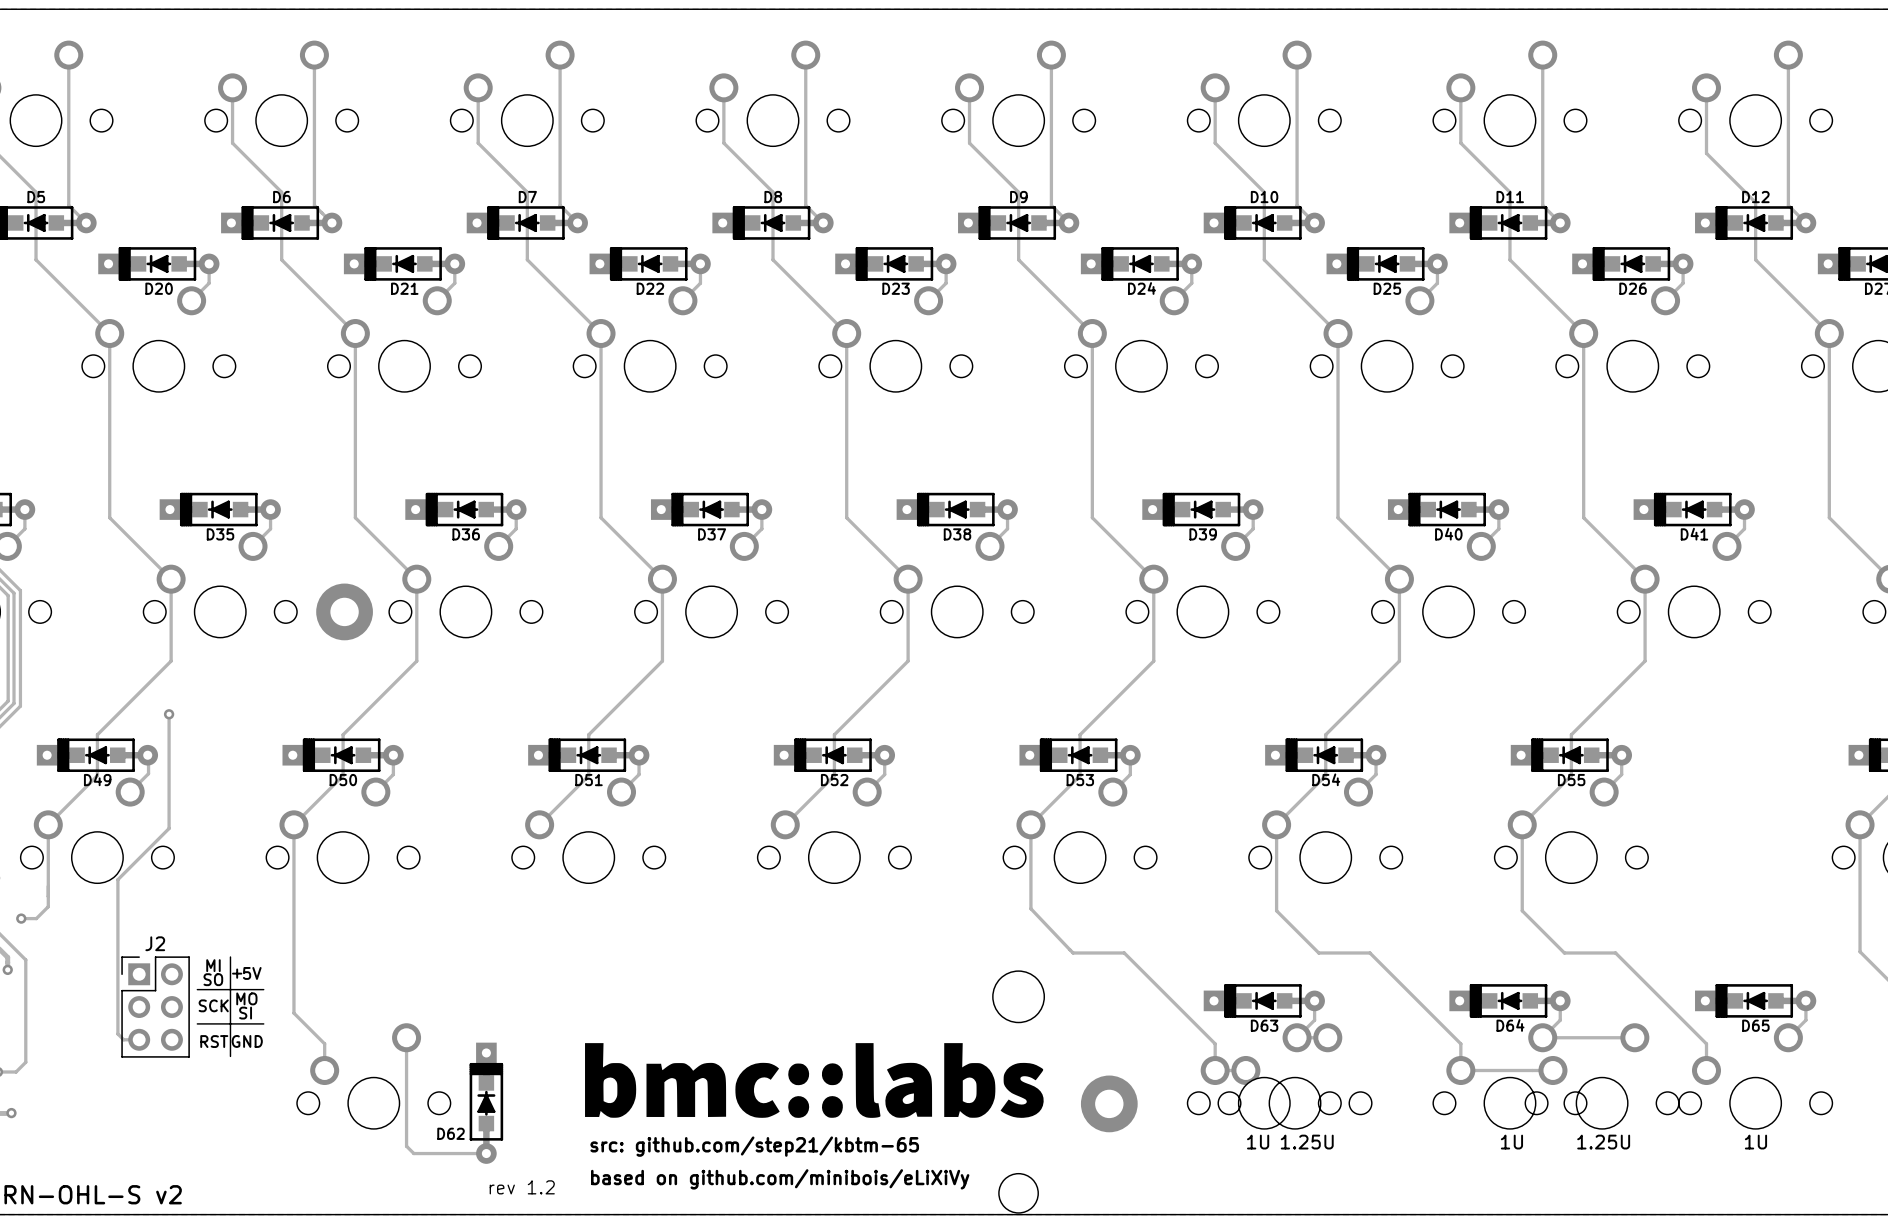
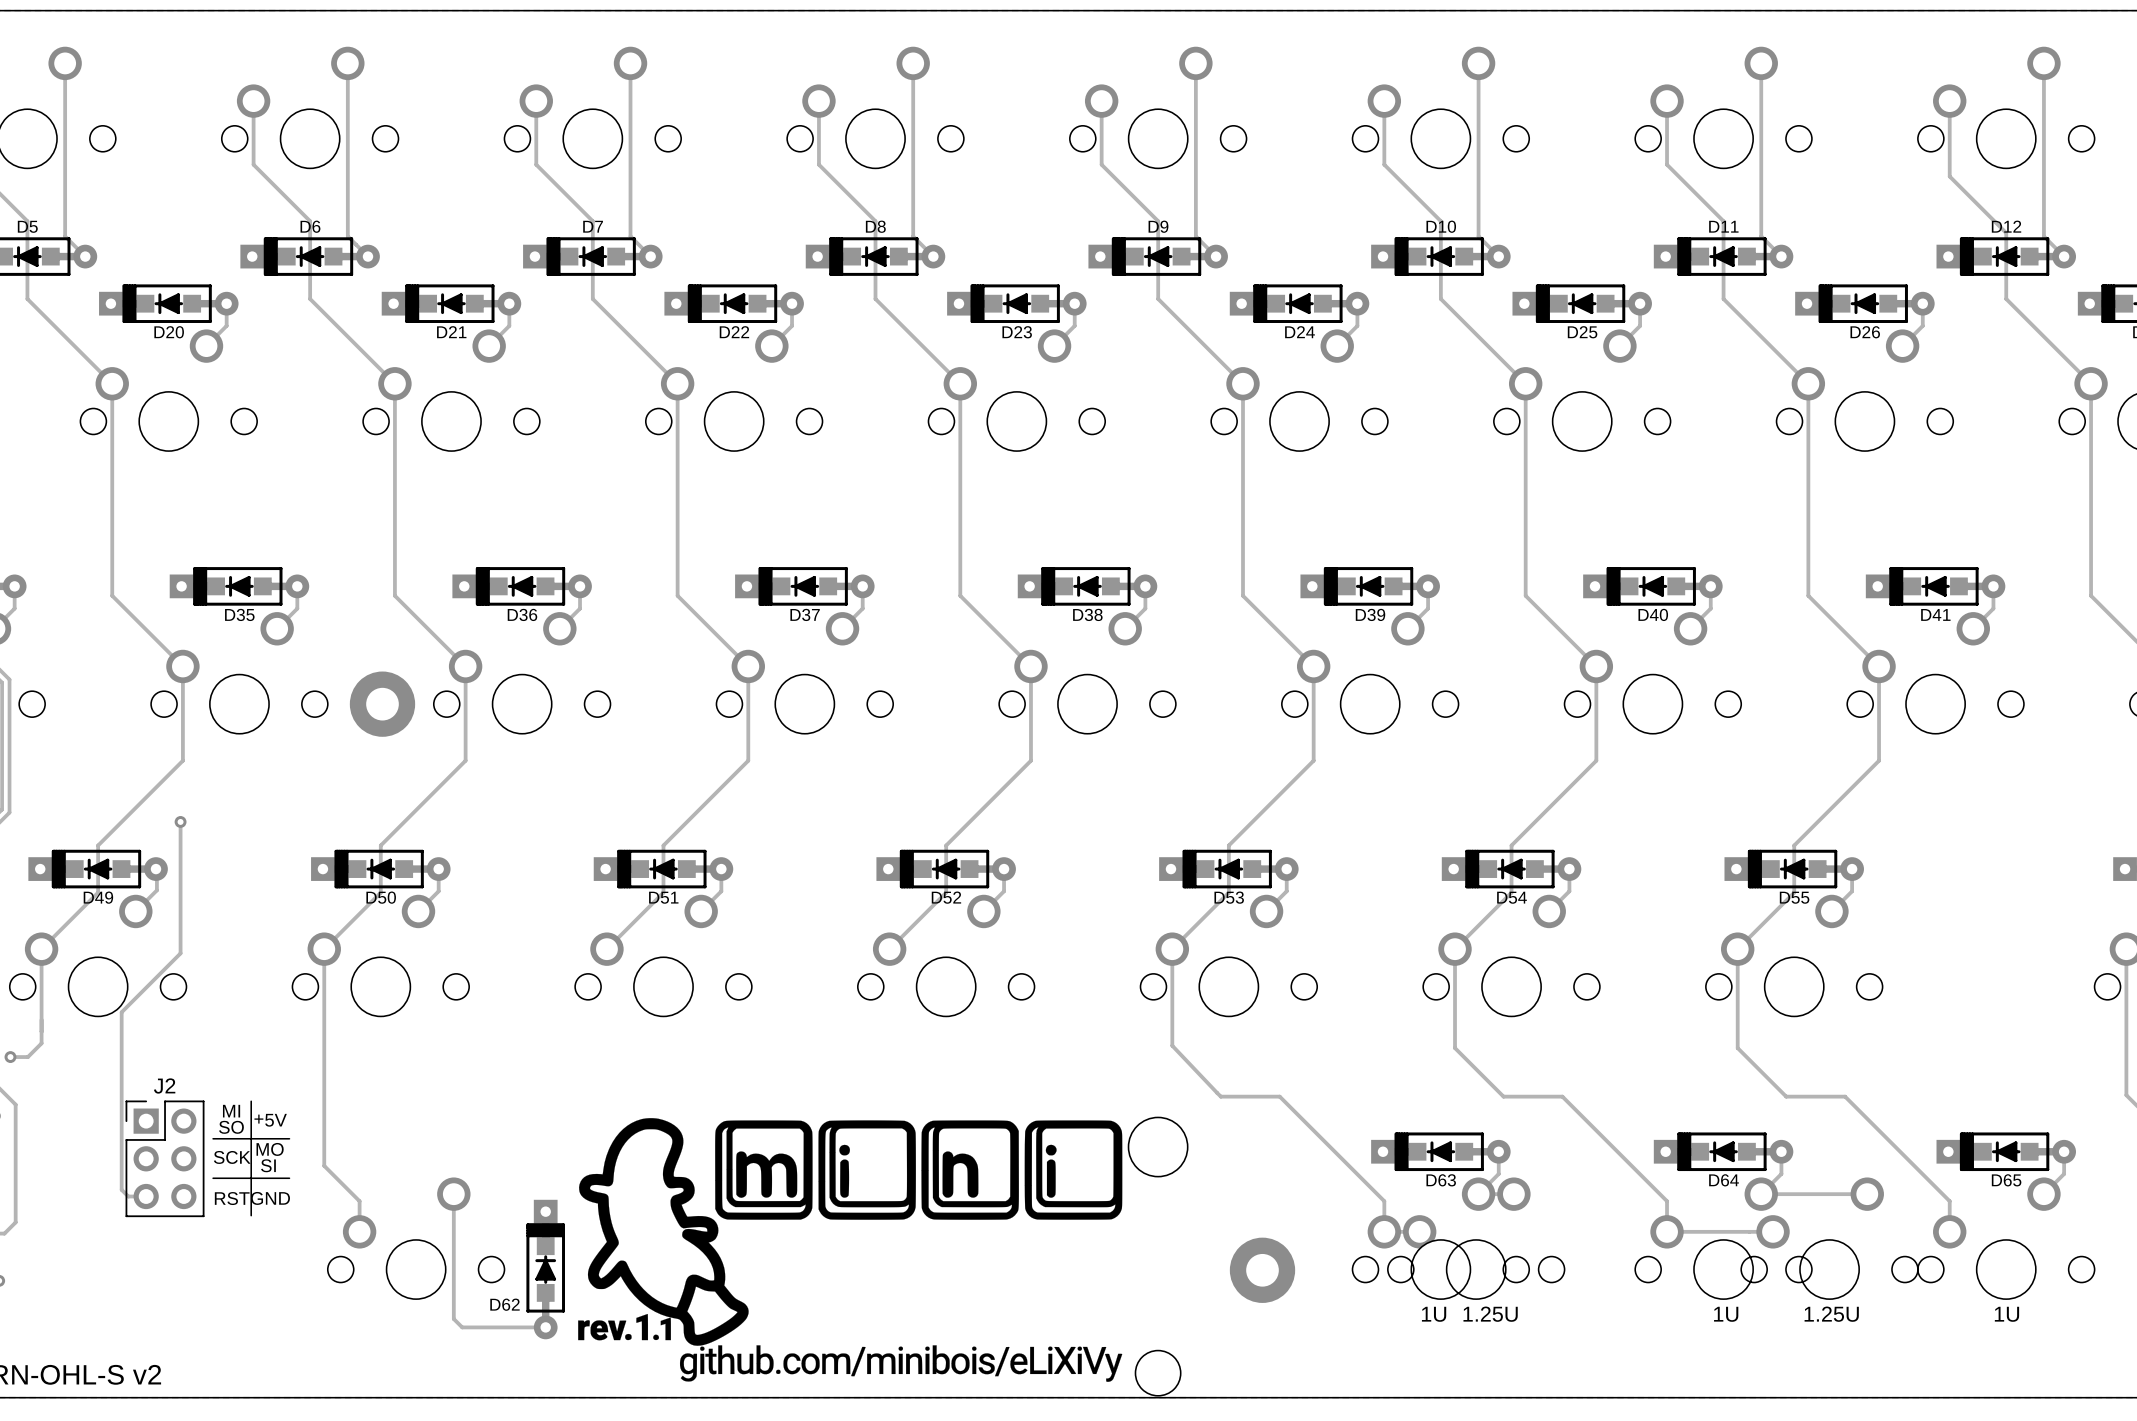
drawing: none -> [578, 1118, 1123, 1382]
drawing: [585, 1043, 1044, 1118] -> none

